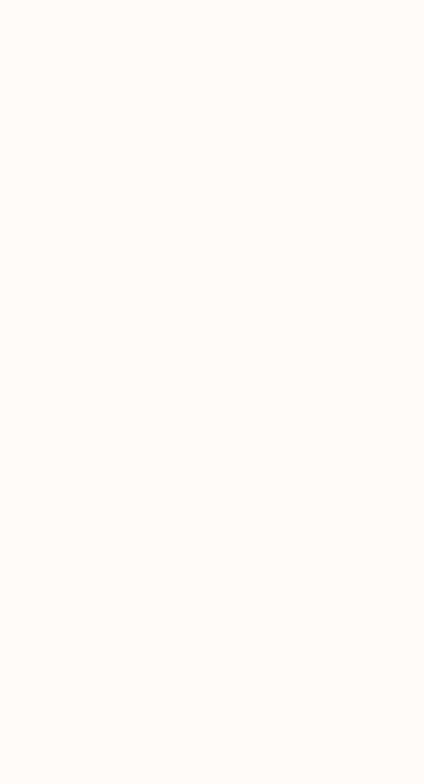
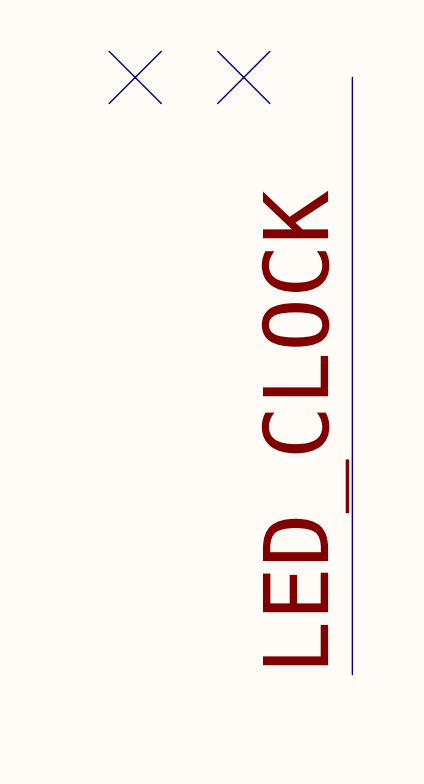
no-connect mark: none -> (135, 77)
no-connect mark: none -> (243, 77)
wire: none -> (352, 77) (352, 674)
label: none -> LED_CLOCK (305, 428)

